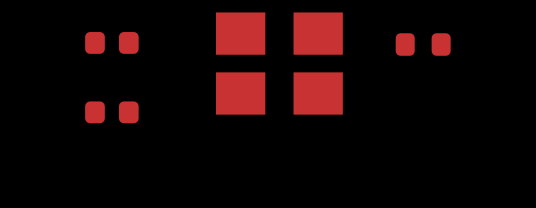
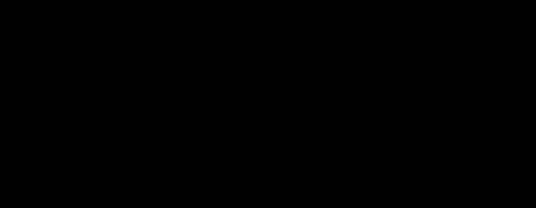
part: (111, 42) -> none
part: (423, 44) -> none
part: (279, 63) -> none
part: (111, 112) -> none

